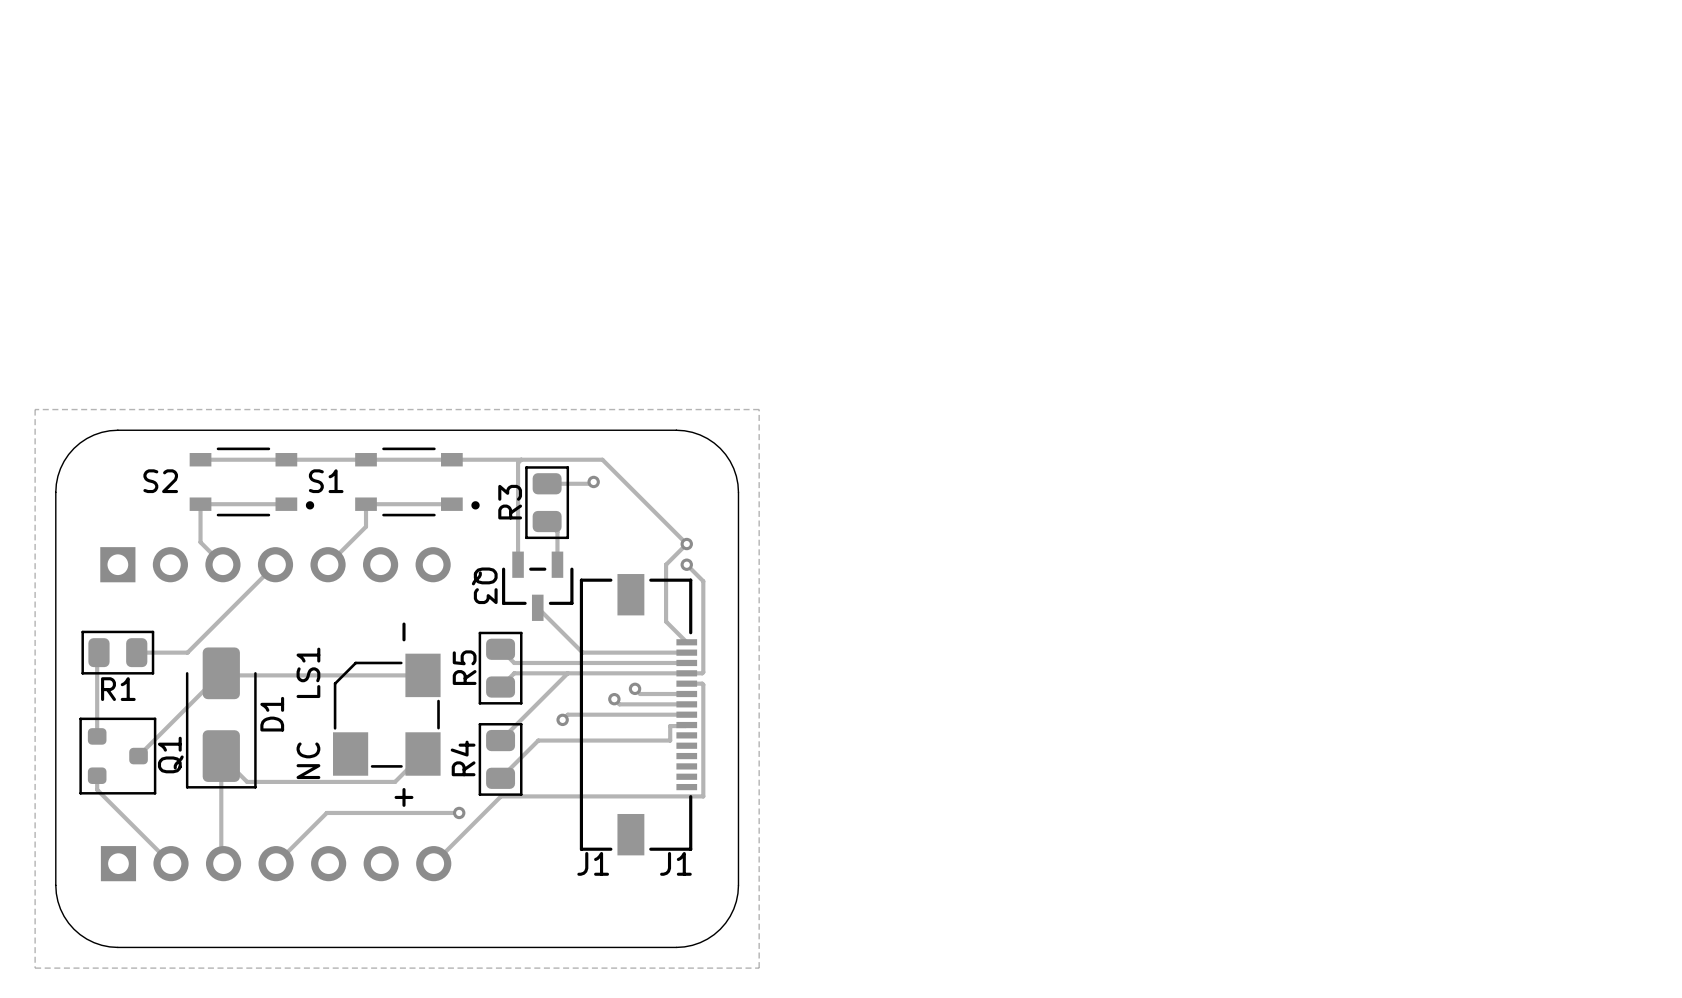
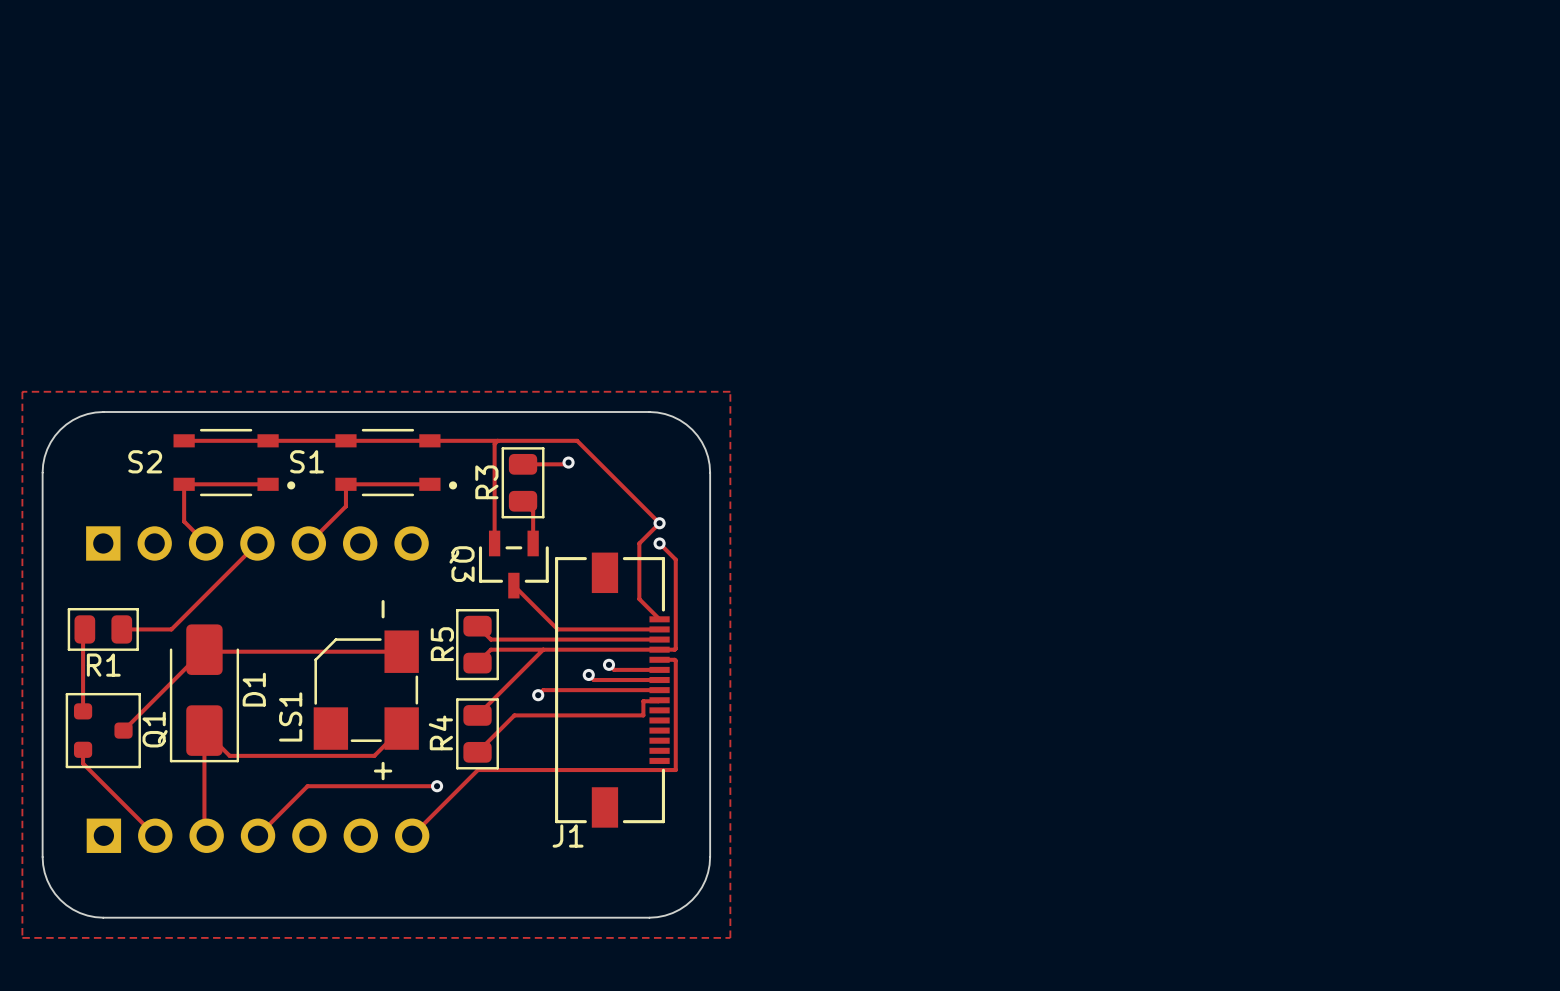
LS1 name position: LS1 (308, 672) -> LS1 (290, 716)
LS1 text: NC (308, 760) -> none
J1 name: J1 (675, 863) -> none

